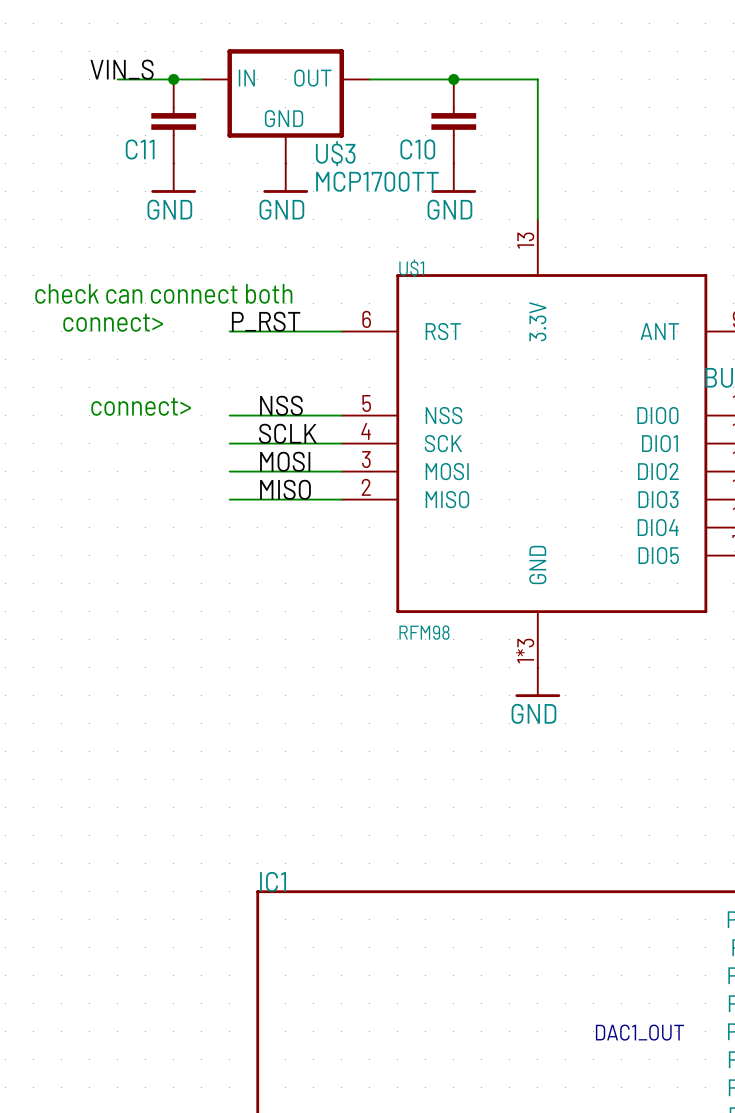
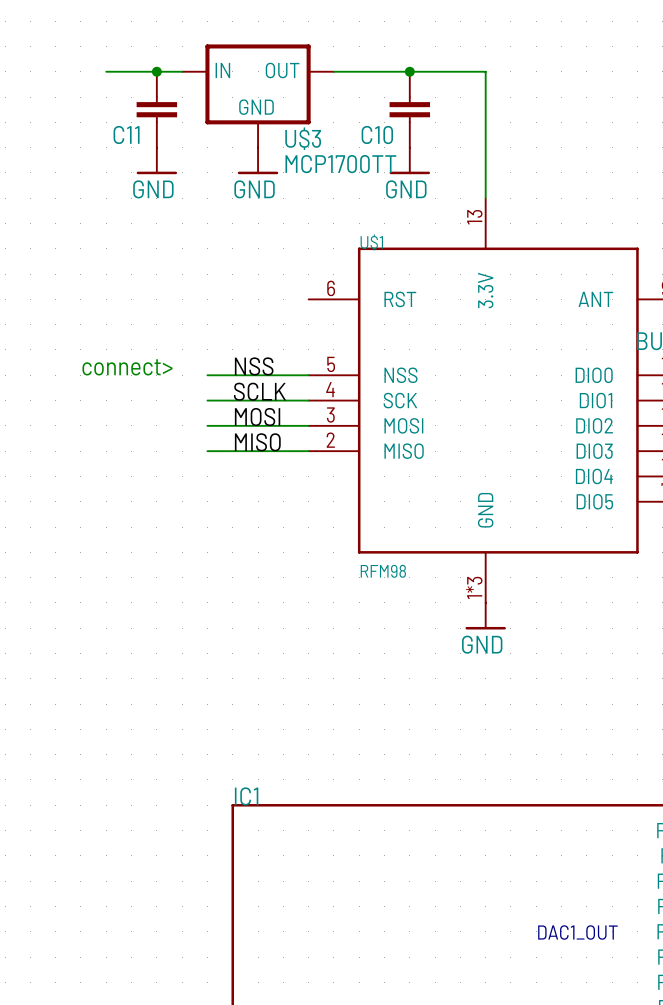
label: VIN_S (122, 69) -> none
text: check can connect both (163, 293) -> none
label: P_RST (266, 321) -> none
text: connect> (113, 322) -> none
wire: (229, 331) (341, 331) -> none

